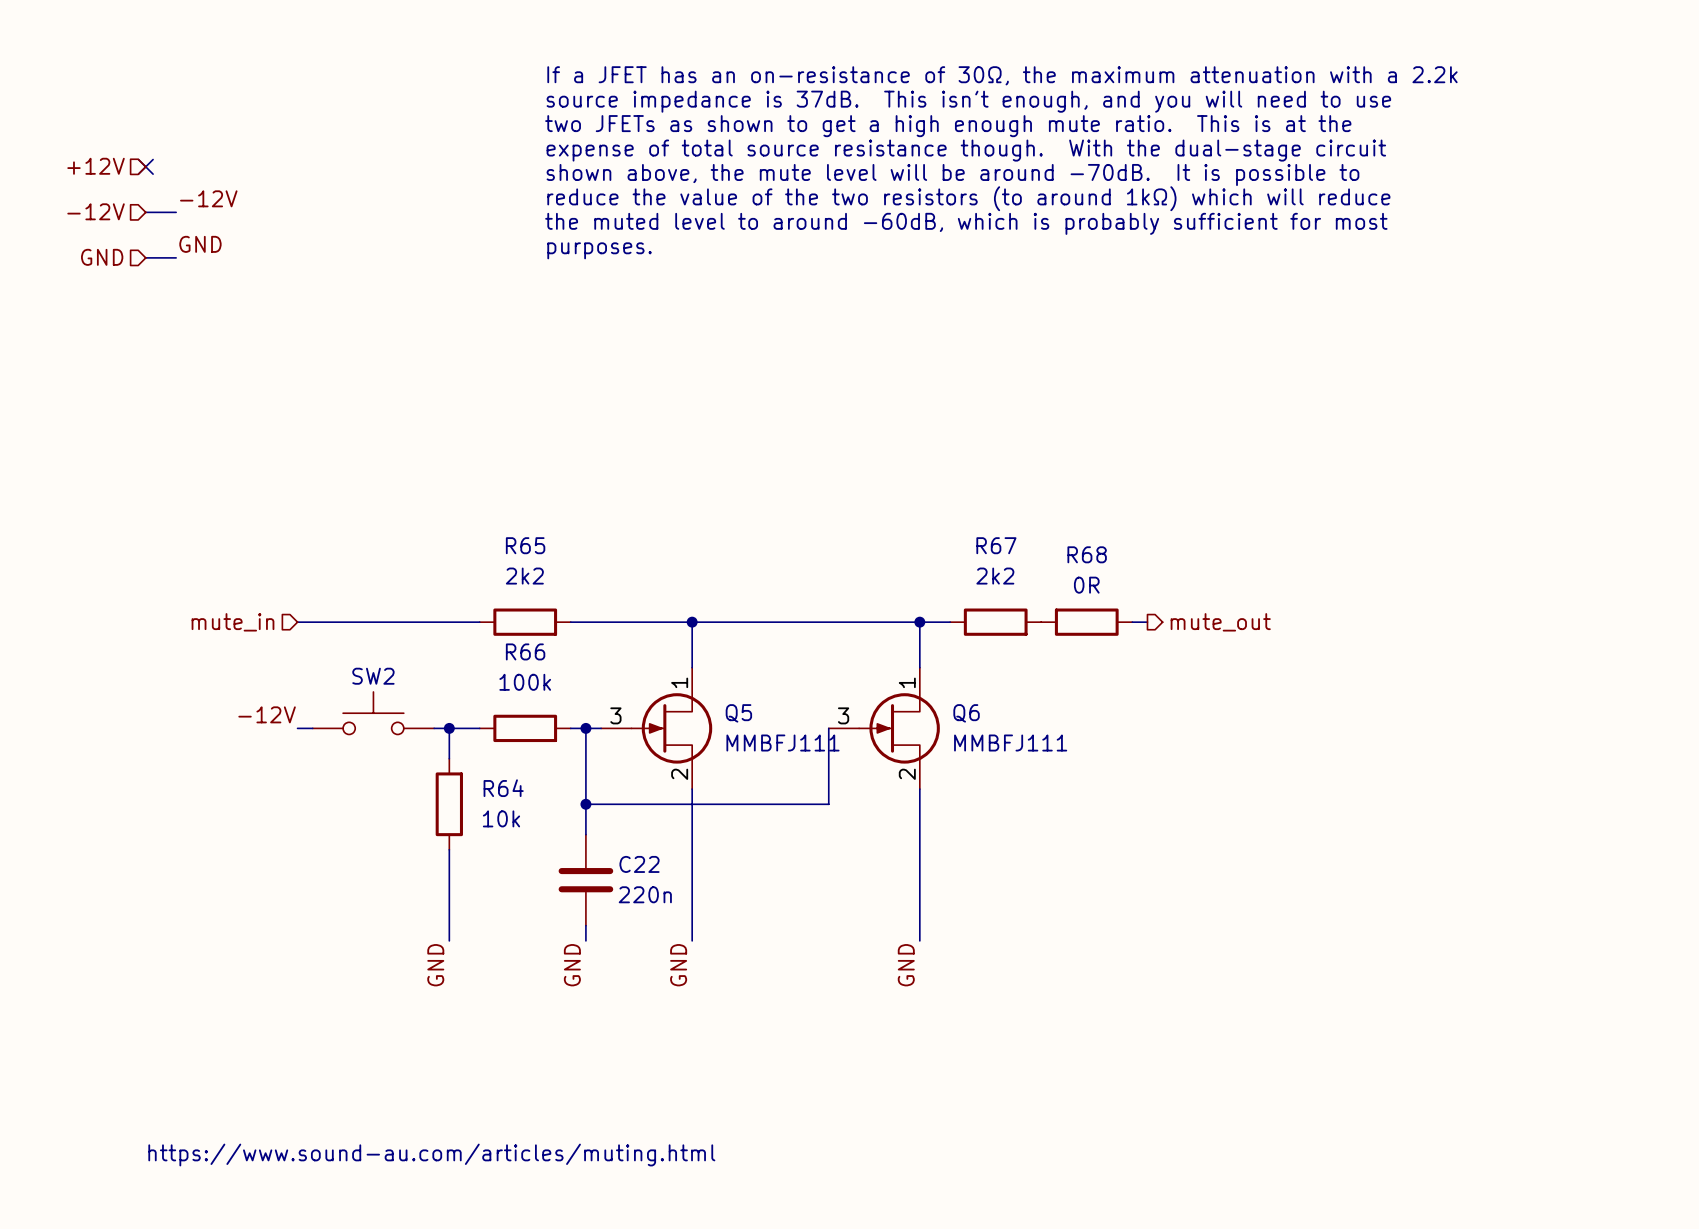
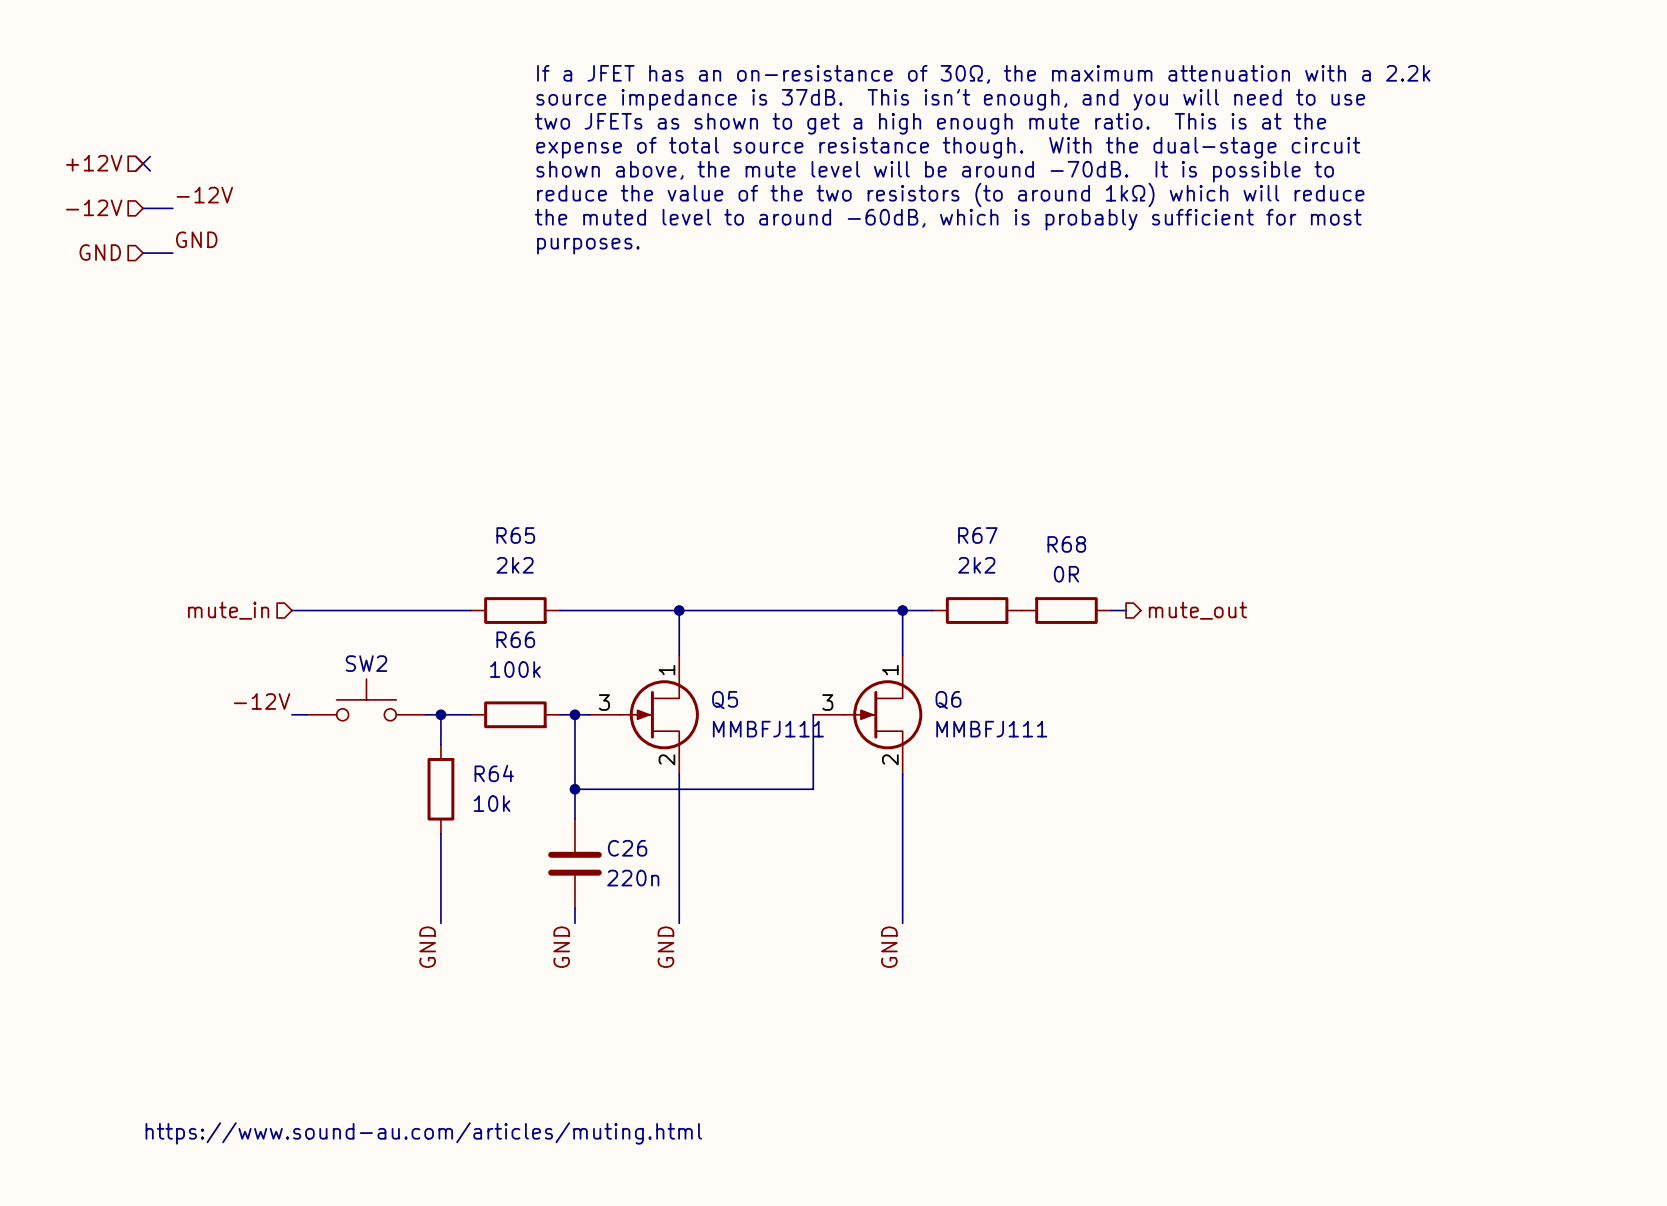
C22 name: C22 (639, 864) -> C26 (627, 848)

